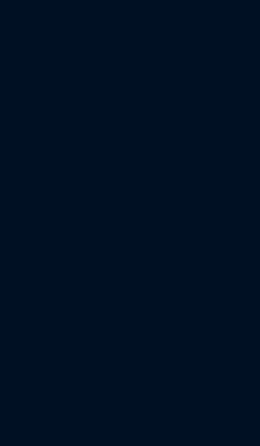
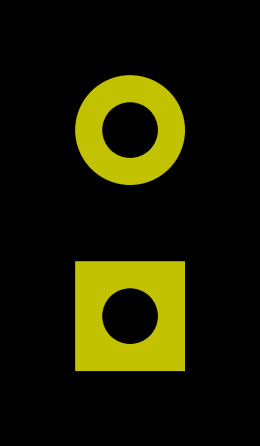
part: none -> (130, 223)

